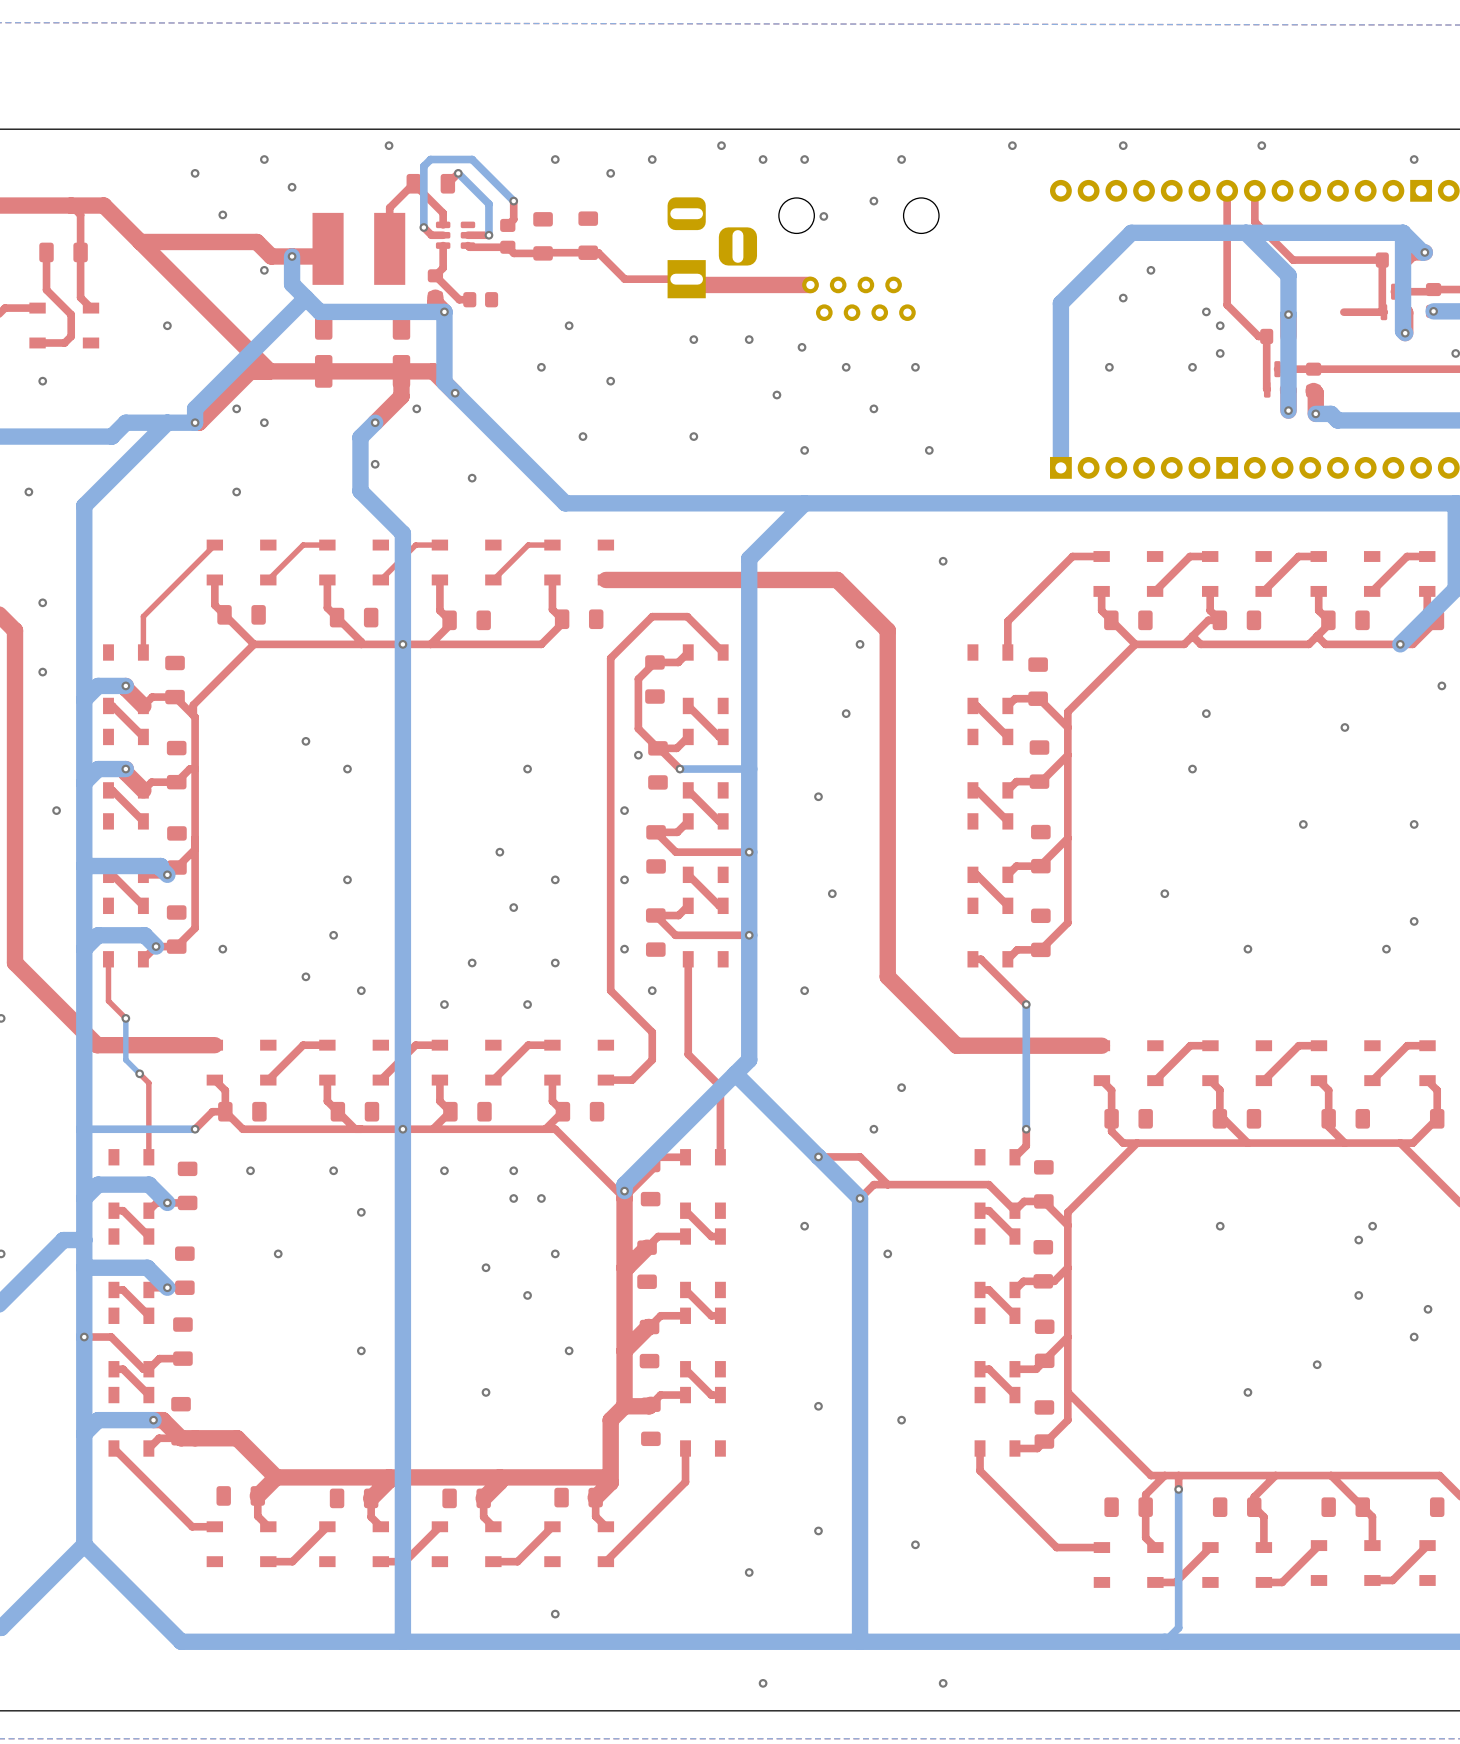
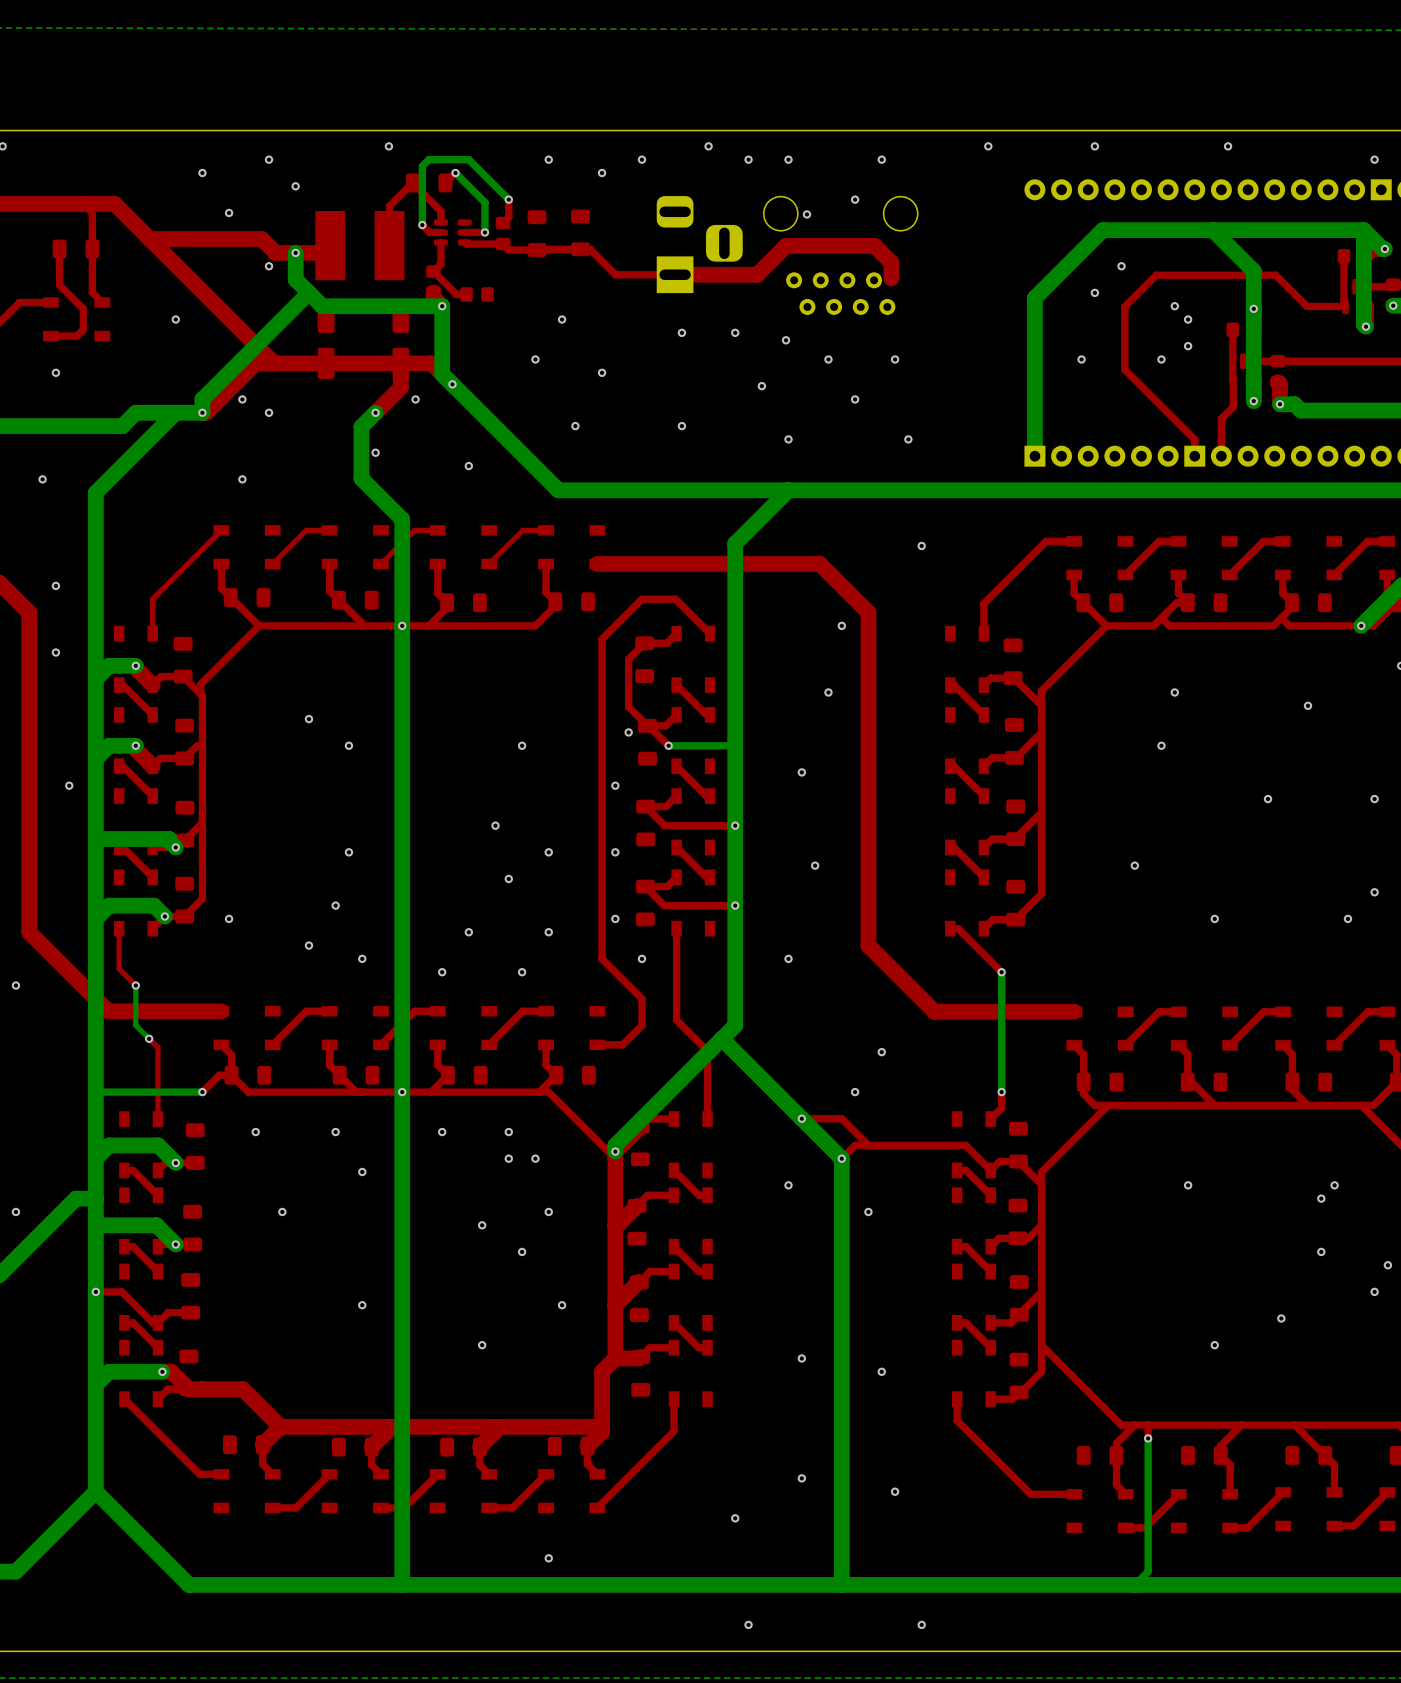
top track: (1227, 190) (1227, 304) (1258, 336) (1266, 336) -> none
top track: (1254, 190) (1254, 221) (1293, 260) (1382, 260) -> none
top track: (686, 279) (692, 284) (810, 284) -> (675, 274) (757, 274) (785, 245) (874, 245) (891, 262) (891, 278)
top track: none -> (1307, 306) (1275, 275) (1156, 275) (1124, 306) (1124, 369) (1194, 439) (1194, 456)
top track: none -> (1233, 380) (1233, 406) (1221, 418) (1221, 456)

